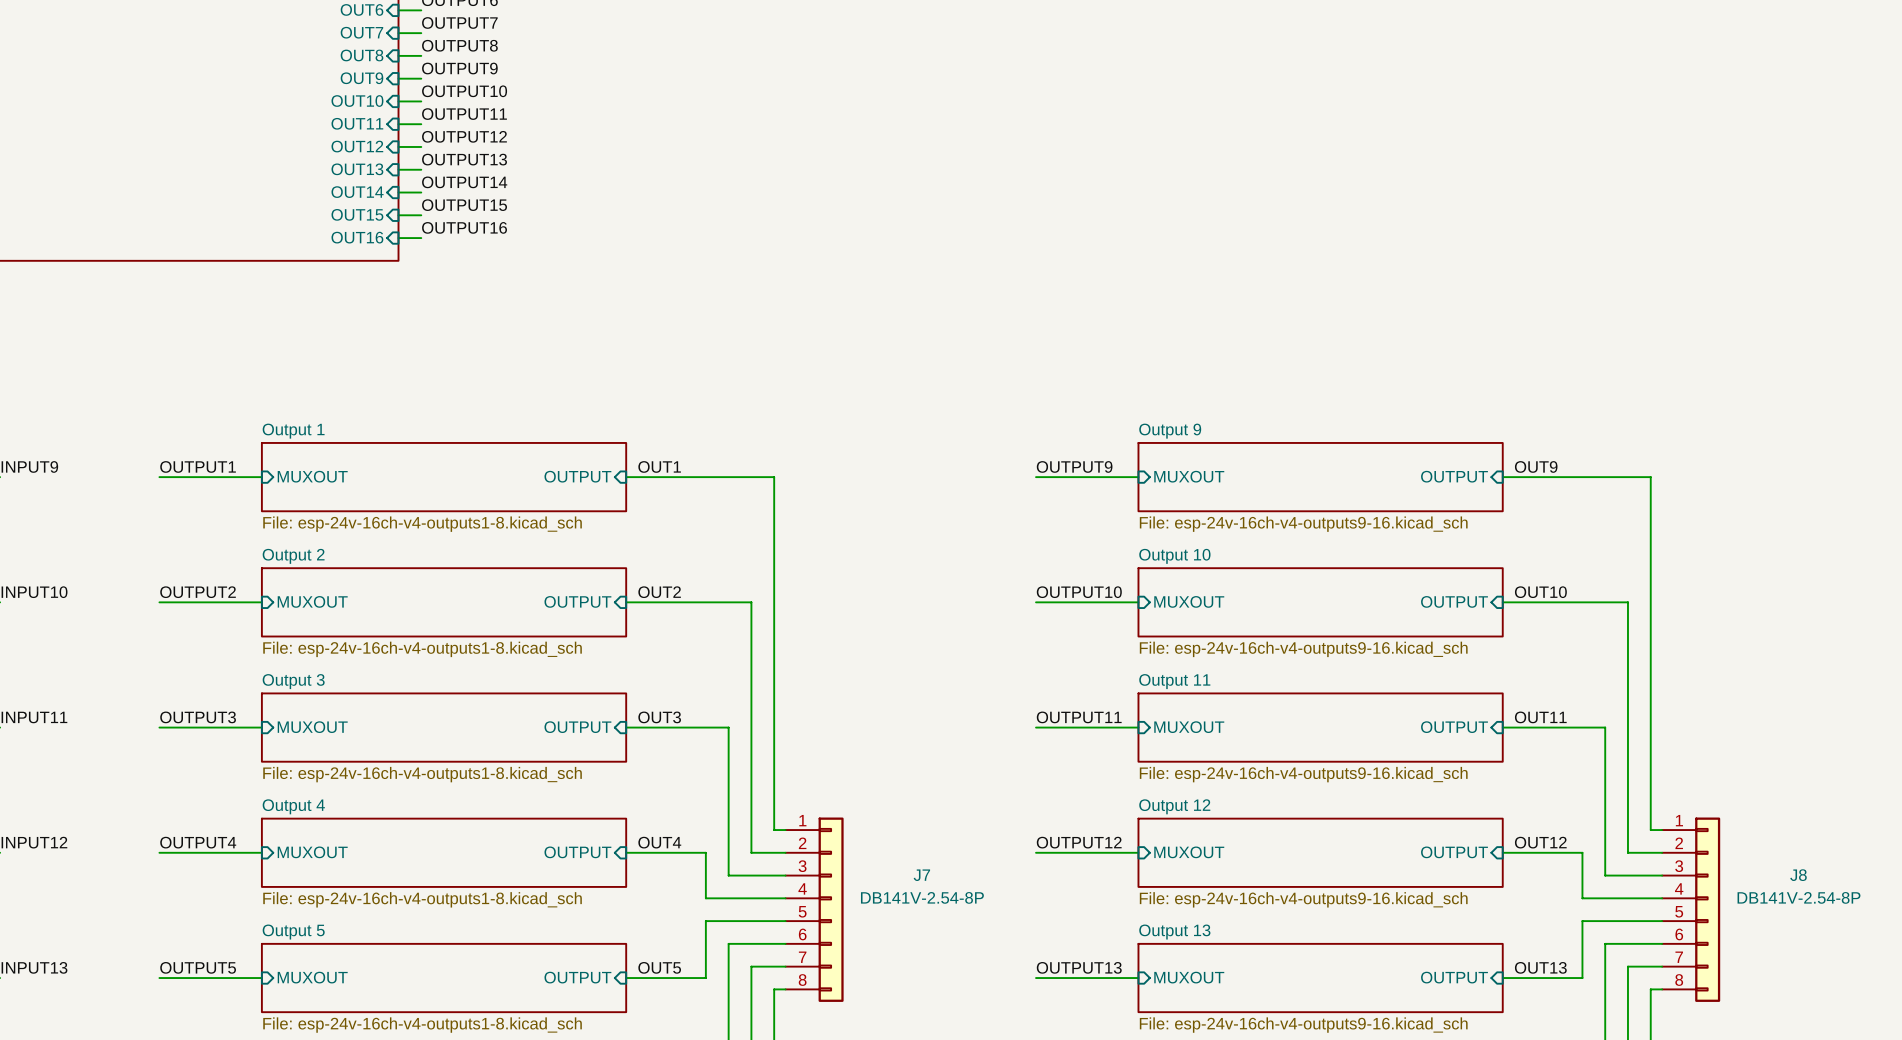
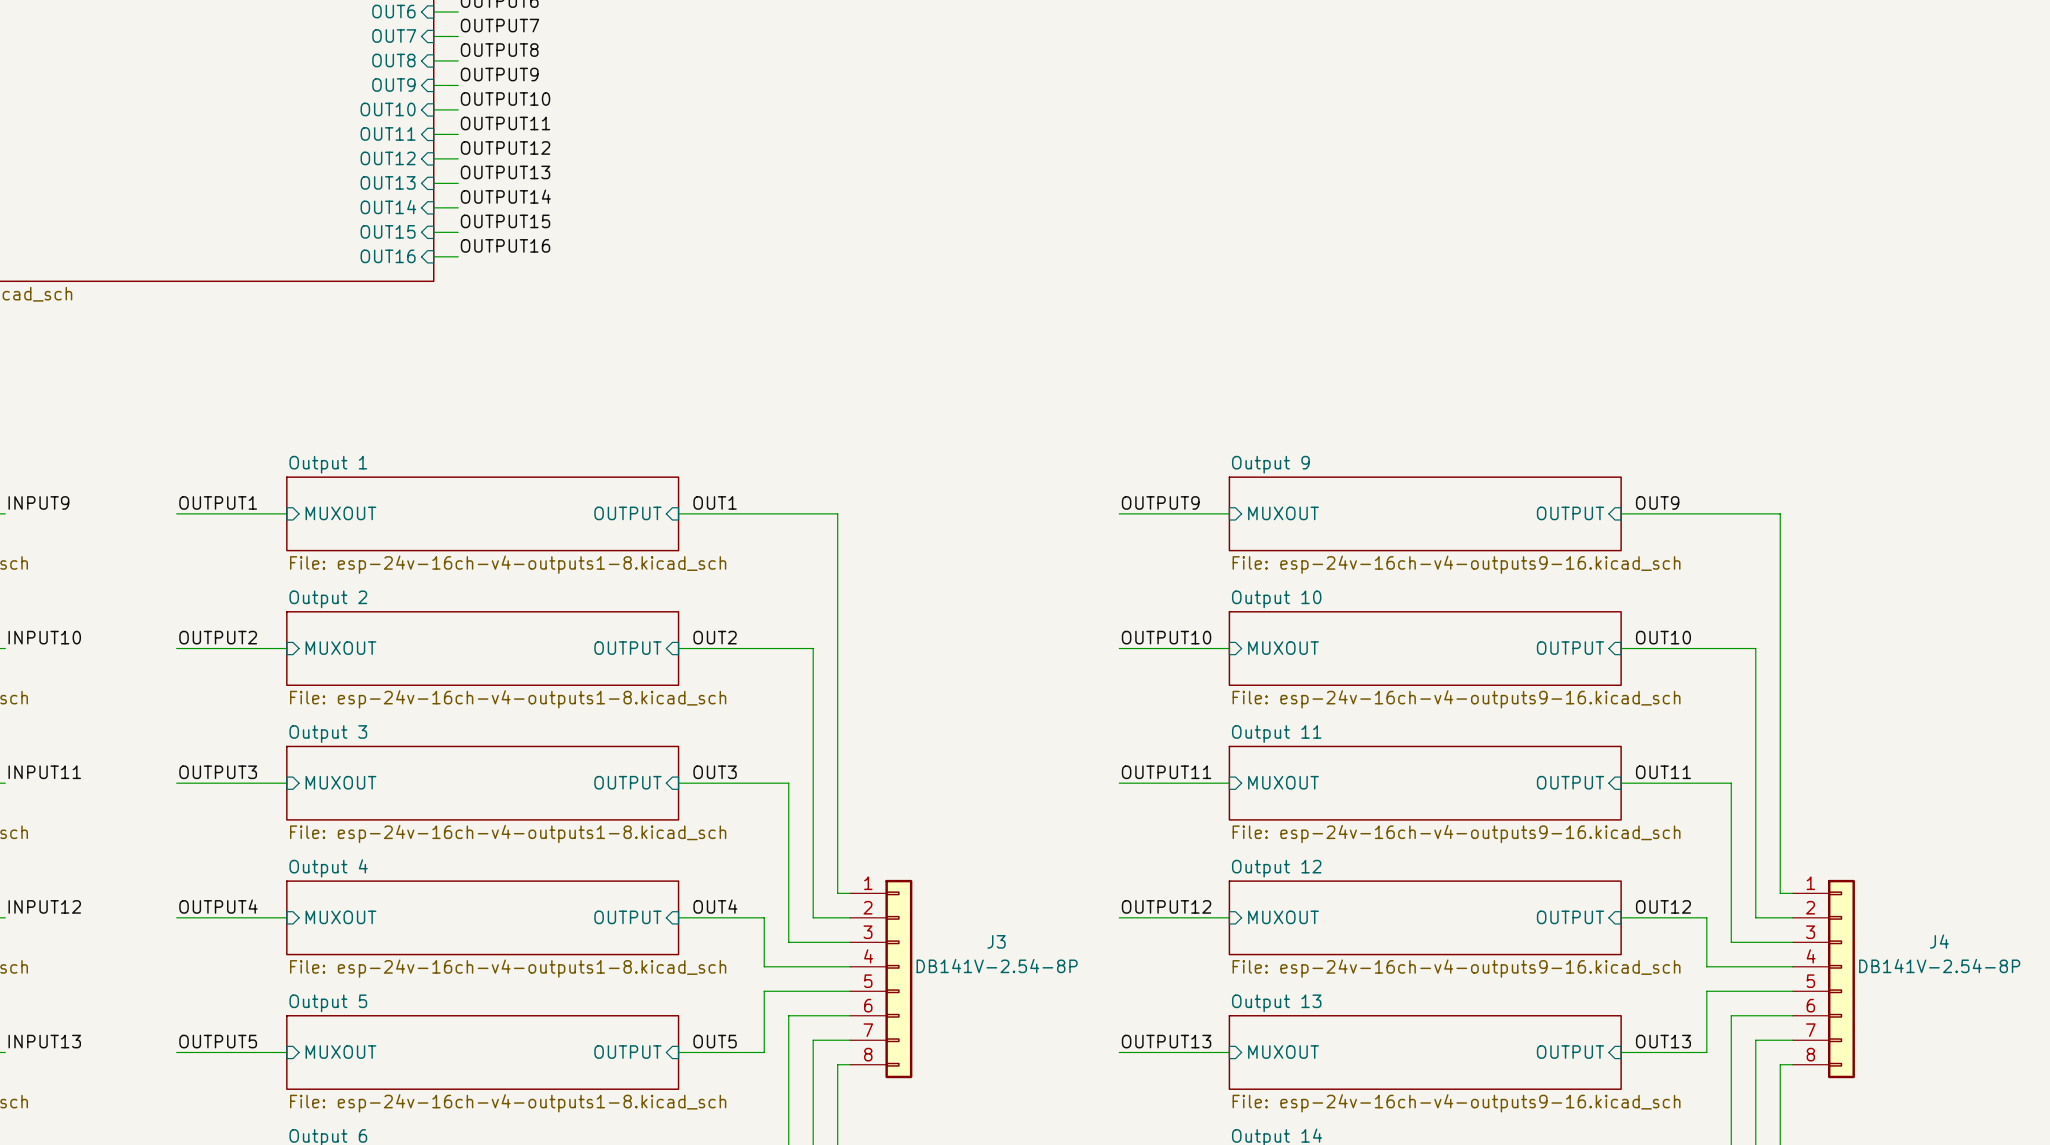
J7 name: J7 (921, 875) -> J3 (996, 941)
J8 name: J8 (1798, 875) -> J4 (1939, 941)

